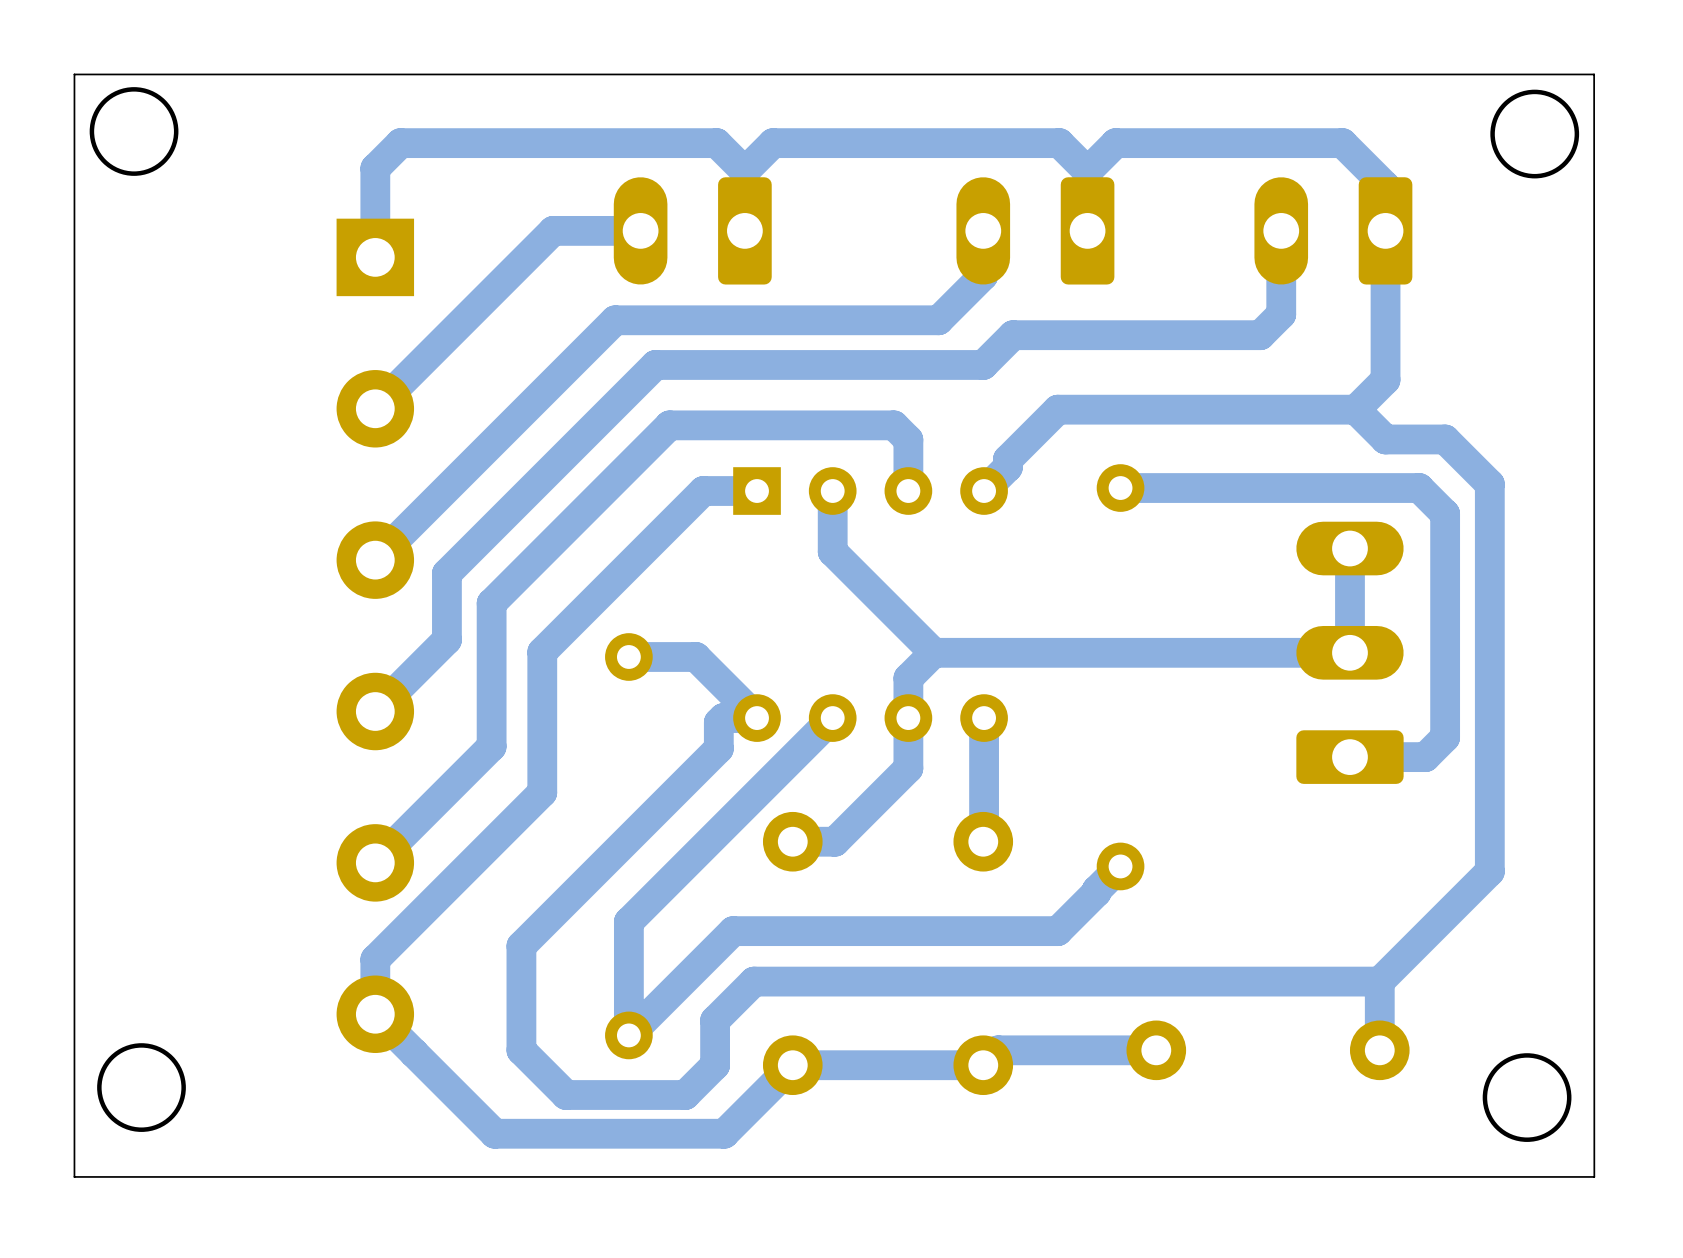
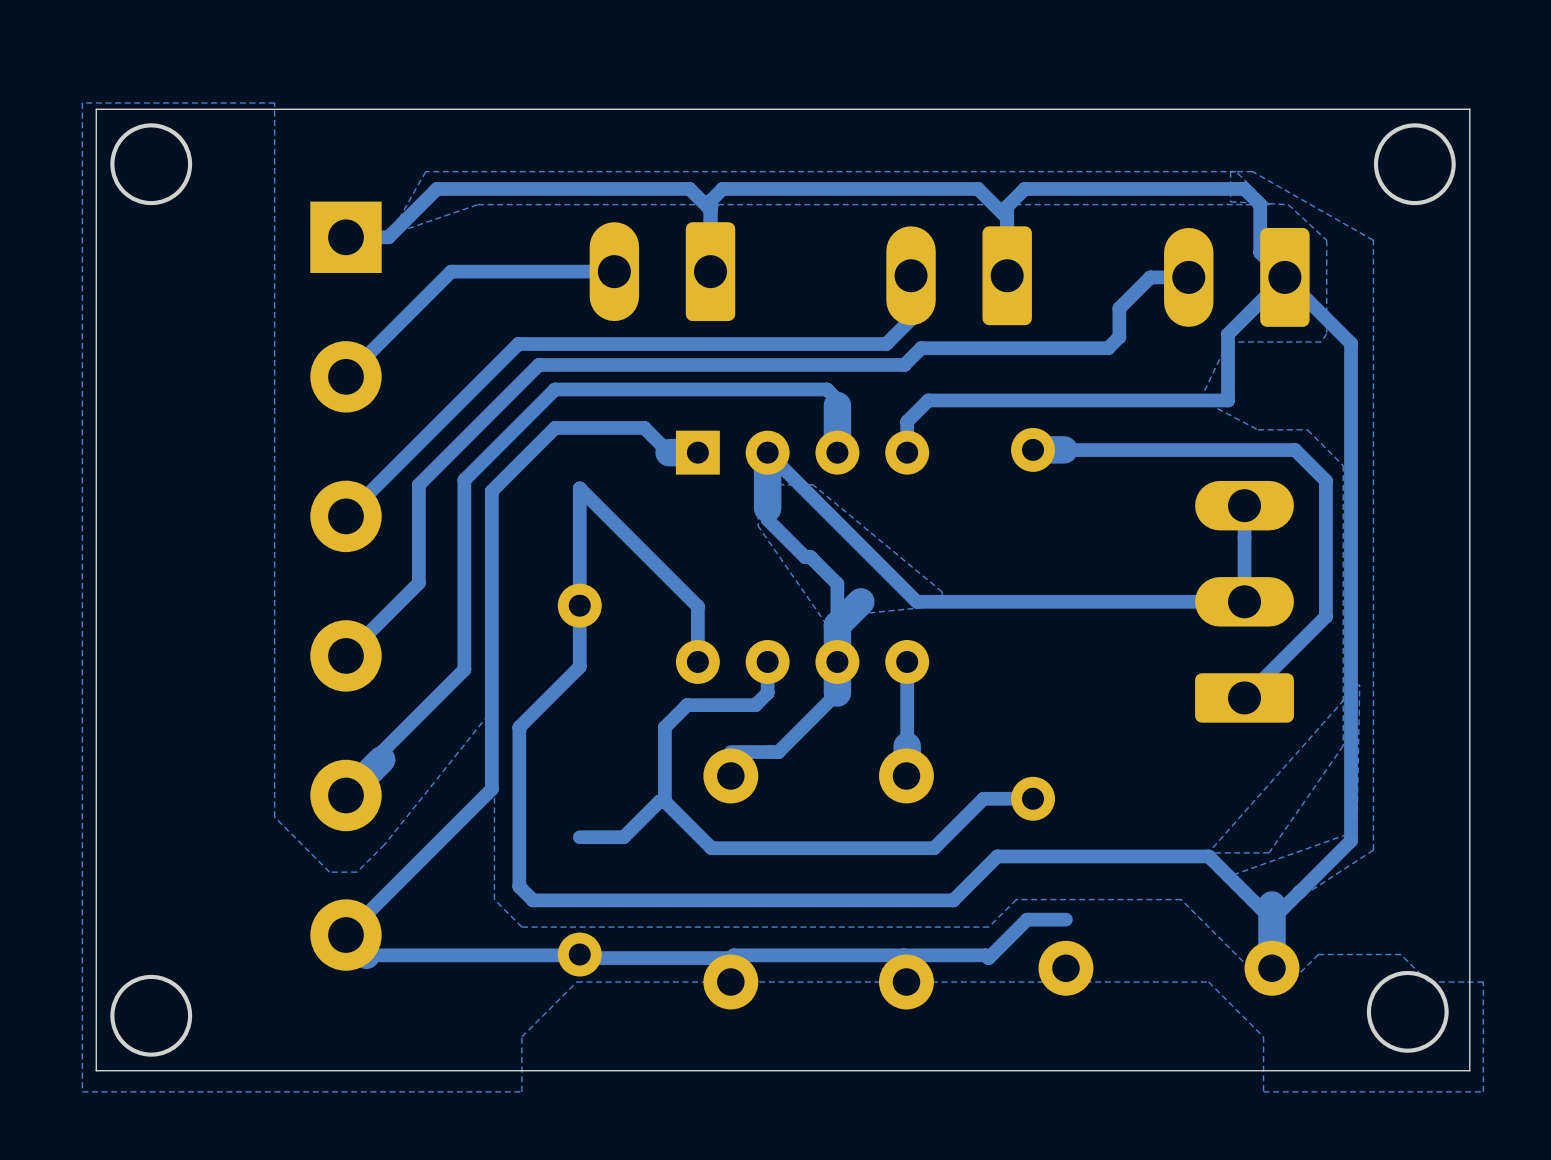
board edge: (1594, 74) (1594, 1176) (74, 1176) (74, 74) (1594, 74) -> (1469, 109) (1469, 1070) (96, 1070) (96, 109) (1469, 109)
zone outline: none -> (274, 102) (274, 817) (329, 872) (357, 872) (384, 844) (494, 707) (494, 899) (521, 927) (988, 927) (1016, 899) (1181, 899) (1263, 982) (1291, 982) (1318, 954) (1400, 954) (1428, 982) (1483, 982) (1483, 1091) (1263, 1091) (1263, 1036) (1208, 982) (576, 982) (521, 1036) (521, 1091) (82, 1091) (82, 102) (274, 102)
round board edge position: (134, 131) -> (151, 164)
round board edge position: (1534, 134) -> (1414, 164)
track: (744, 171) (716, 143) (400, 143) (375, 168) (375, 257) -> (710, 209) (689, 188) (436, 188) (388, 237) (345, 237)
track: (1087, 171) (1115, 143) (1342, 143) (1385, 186) (1385, 379) (1355, 409) -> none
track: (1087, 171) (1059, 143) (773, 143) (744, 171) -> none
zone outline: none -> (1236, 171) (1269, 204) (477, 204) (390, 234) (425, 171) (1252, 171) (1373, 240) (1373, 850) (1271, 916) (1208, 852) (1269, 852) (1343, 745) (1343, 465) (1307, 429) (1258, 429) (1200, 399) (1227, 341) (1321, 341) (1326, 333) (1326, 240) (1288, 204) (1230, 201) (1230, 171)
track: (640, 230) (553, 230) (489, 294) -> (614, 271) (451, 271)
part position: (692, 230) -> (662, 271)
track: (983, 230) (983, 275) (938, 320) (615, 320) (562, 373) -> (911, 275) (911, 319) (886, 344) (518, 344)
part position: (1035, 230) -> (959, 275)
track: (1281, 230) (1281, 314) (1260, 335) (1013, 335) (983, 364) (655, 364) (446, 573) (446, 639) -> (1188, 277) (1150, 277) (1119, 308) (1119, 337) (1108, 348) (921, 348) (904, 364) (538, 364) (418, 484) (418, 583) (412, 589)
part position: (1333, 230) -> (1236, 277)
track: none -> (1007, 218) (978, 188) (722, 188) (710, 201) (710, 271)
track width: thick (489, 294) (375, 408) -> thin (451, 271) (345, 376)
track: none -> (1007, 275) (1007, 206) (1024, 188) (1244, 188) (1260, 204) (1260, 252) (1351, 343) (1351, 840) (1271, 919) (1208, 856) (997, 856) (953, 900) (533, 900) (519, 886) (519, 727) (579, 666) (579, 488) (697, 606) (697, 661)
track width: thick (562, 373) (375, 560) -> thin (518, 344) (345, 516)
track: (1355, 409) (1057, 409) (1007, 459) (1007, 467) (984, 491) -> (1284, 277) (1228, 334) (1228, 400) (928, 400) (907, 421) (907, 452)
track: (1355, 409) (1385, 439) (1445, 439) (1489, 484) (1489, 871) (1379, 981) (754, 981) (715, 1020) (715, 1065) (685, 1095) (566, 1095) (521, 1050) (521, 946) (718, 748) (718, 722) (723, 718) (757, 718) (695, 656) (628, 656) -> none
track: (908, 439) (893, 425) (669, 425) (491, 603) (491, 746) (414, 824) -> (837, 405) (837, 399) (826, 389) (555, 389) (464, 480) (464, 669) (381, 752) (381, 759)
track: (1154, 488) (1419, 488) (1445, 513) (1445, 737) (1425, 757) (1349, 757) -> (1064, 450) (1295, 450) (1325, 480) (1325, 616) (1244, 697)
track: (725, 491) (703, 491) (542, 652) (542, 792) (375, 959) (375, 1014) -> (669, 452) (644, 427) (555, 427) (491, 491) (491, 789) (345, 935)
zone outline: none -> (813, 484) (758, 484) (758, 526) (826, 624) (848, 624) (859, 613) (942, 605) (942, 591) (813, 484)
track width: thick (1349, 548) (1349, 652) (994, 652) -> thin (1244, 505) (1244, 601) (916, 601)
track: (832, 551) (933, 652) (994, 652) -> (767, 452) (916, 601)
track: none -> (767, 508) (767, 519) (805, 557) (810, 557) (837, 583) (837, 625)
track width: thick (446, 639) (375, 711) -> thin (412, 589) (345, 655)
track: (832, 718) (628, 921) (628, 1035) (733, 931) (1057, 931) (1120, 866) -> (664, 801) (711, 848) (934, 848) (983, 798) (1033, 798)
track: none -> (767, 661) (767, 693) (755, 705) (687, 705) (664, 727) (664, 801)
track width: thick (984, 718) (984, 809) -> thin (907, 661) (907, 746)
zone outline: none -> (1359, 685) (1356, 830) (1233, 874) (1205, 855) (1356, 685) (1359, 685)
track: (908, 751) (908, 768) (834, 841) (792, 841) -> (837, 693) (778, 752) (730, 752)
track: none -> (664, 801) (659, 801) (623, 837) (579, 837)
track: (397, 1036) (494, 1133) (724, 1133) (792, 1065) (983, 1065) (998, 1050) (1156, 1050) -> (366, 955) (585, 955) (588, 958) (730, 958) (733, 955) (985, 955) (988, 958) (1027, 919) (1065, 919)
round board edge position: (141, 1087) -> (151, 1015)

